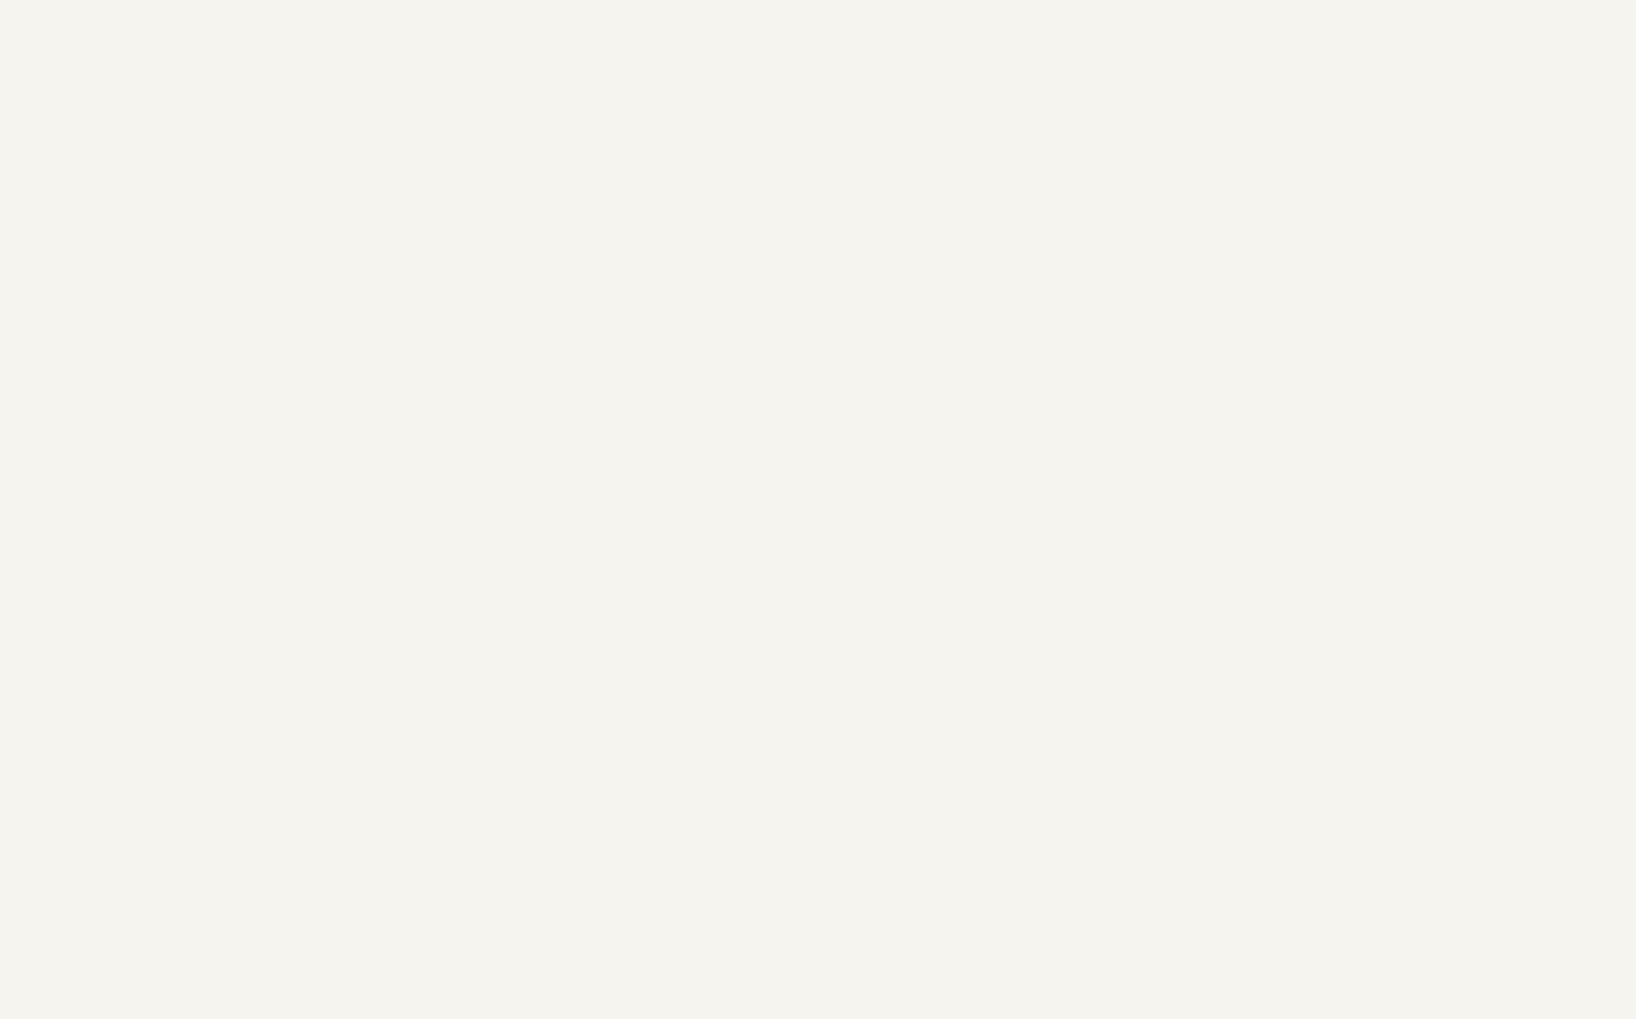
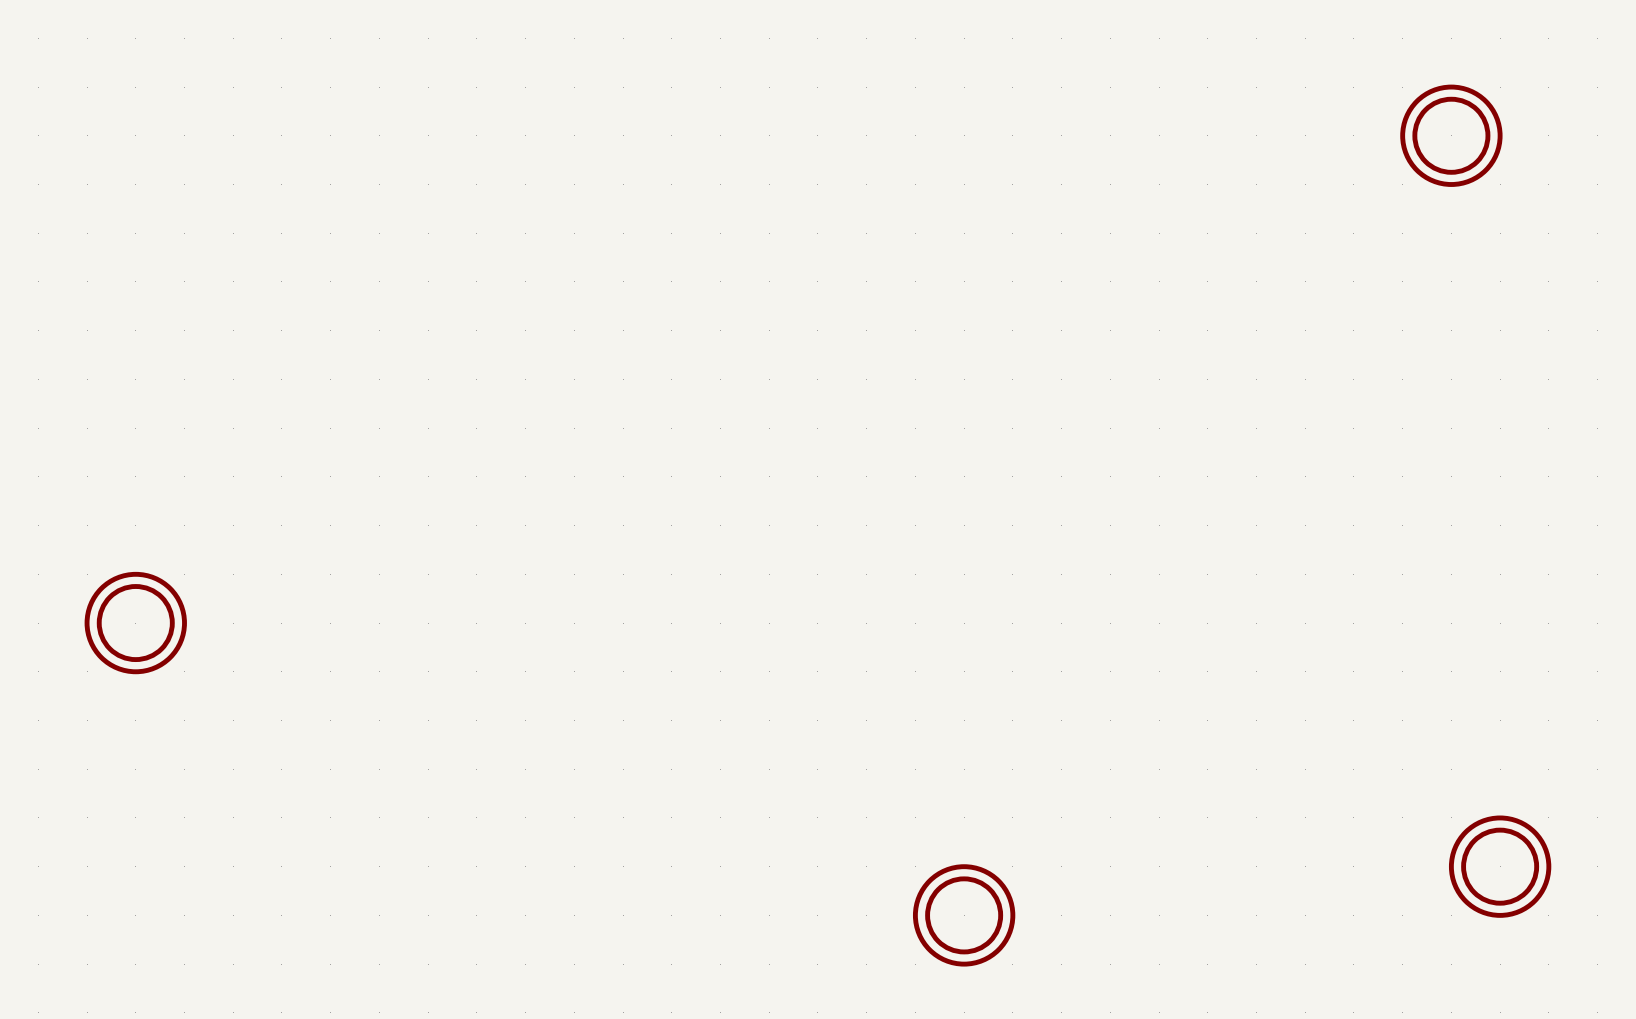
part: none -> (1451, 135)
part: none -> (135, 623)
part: none -> (1500, 866)
part: none -> (964, 915)

